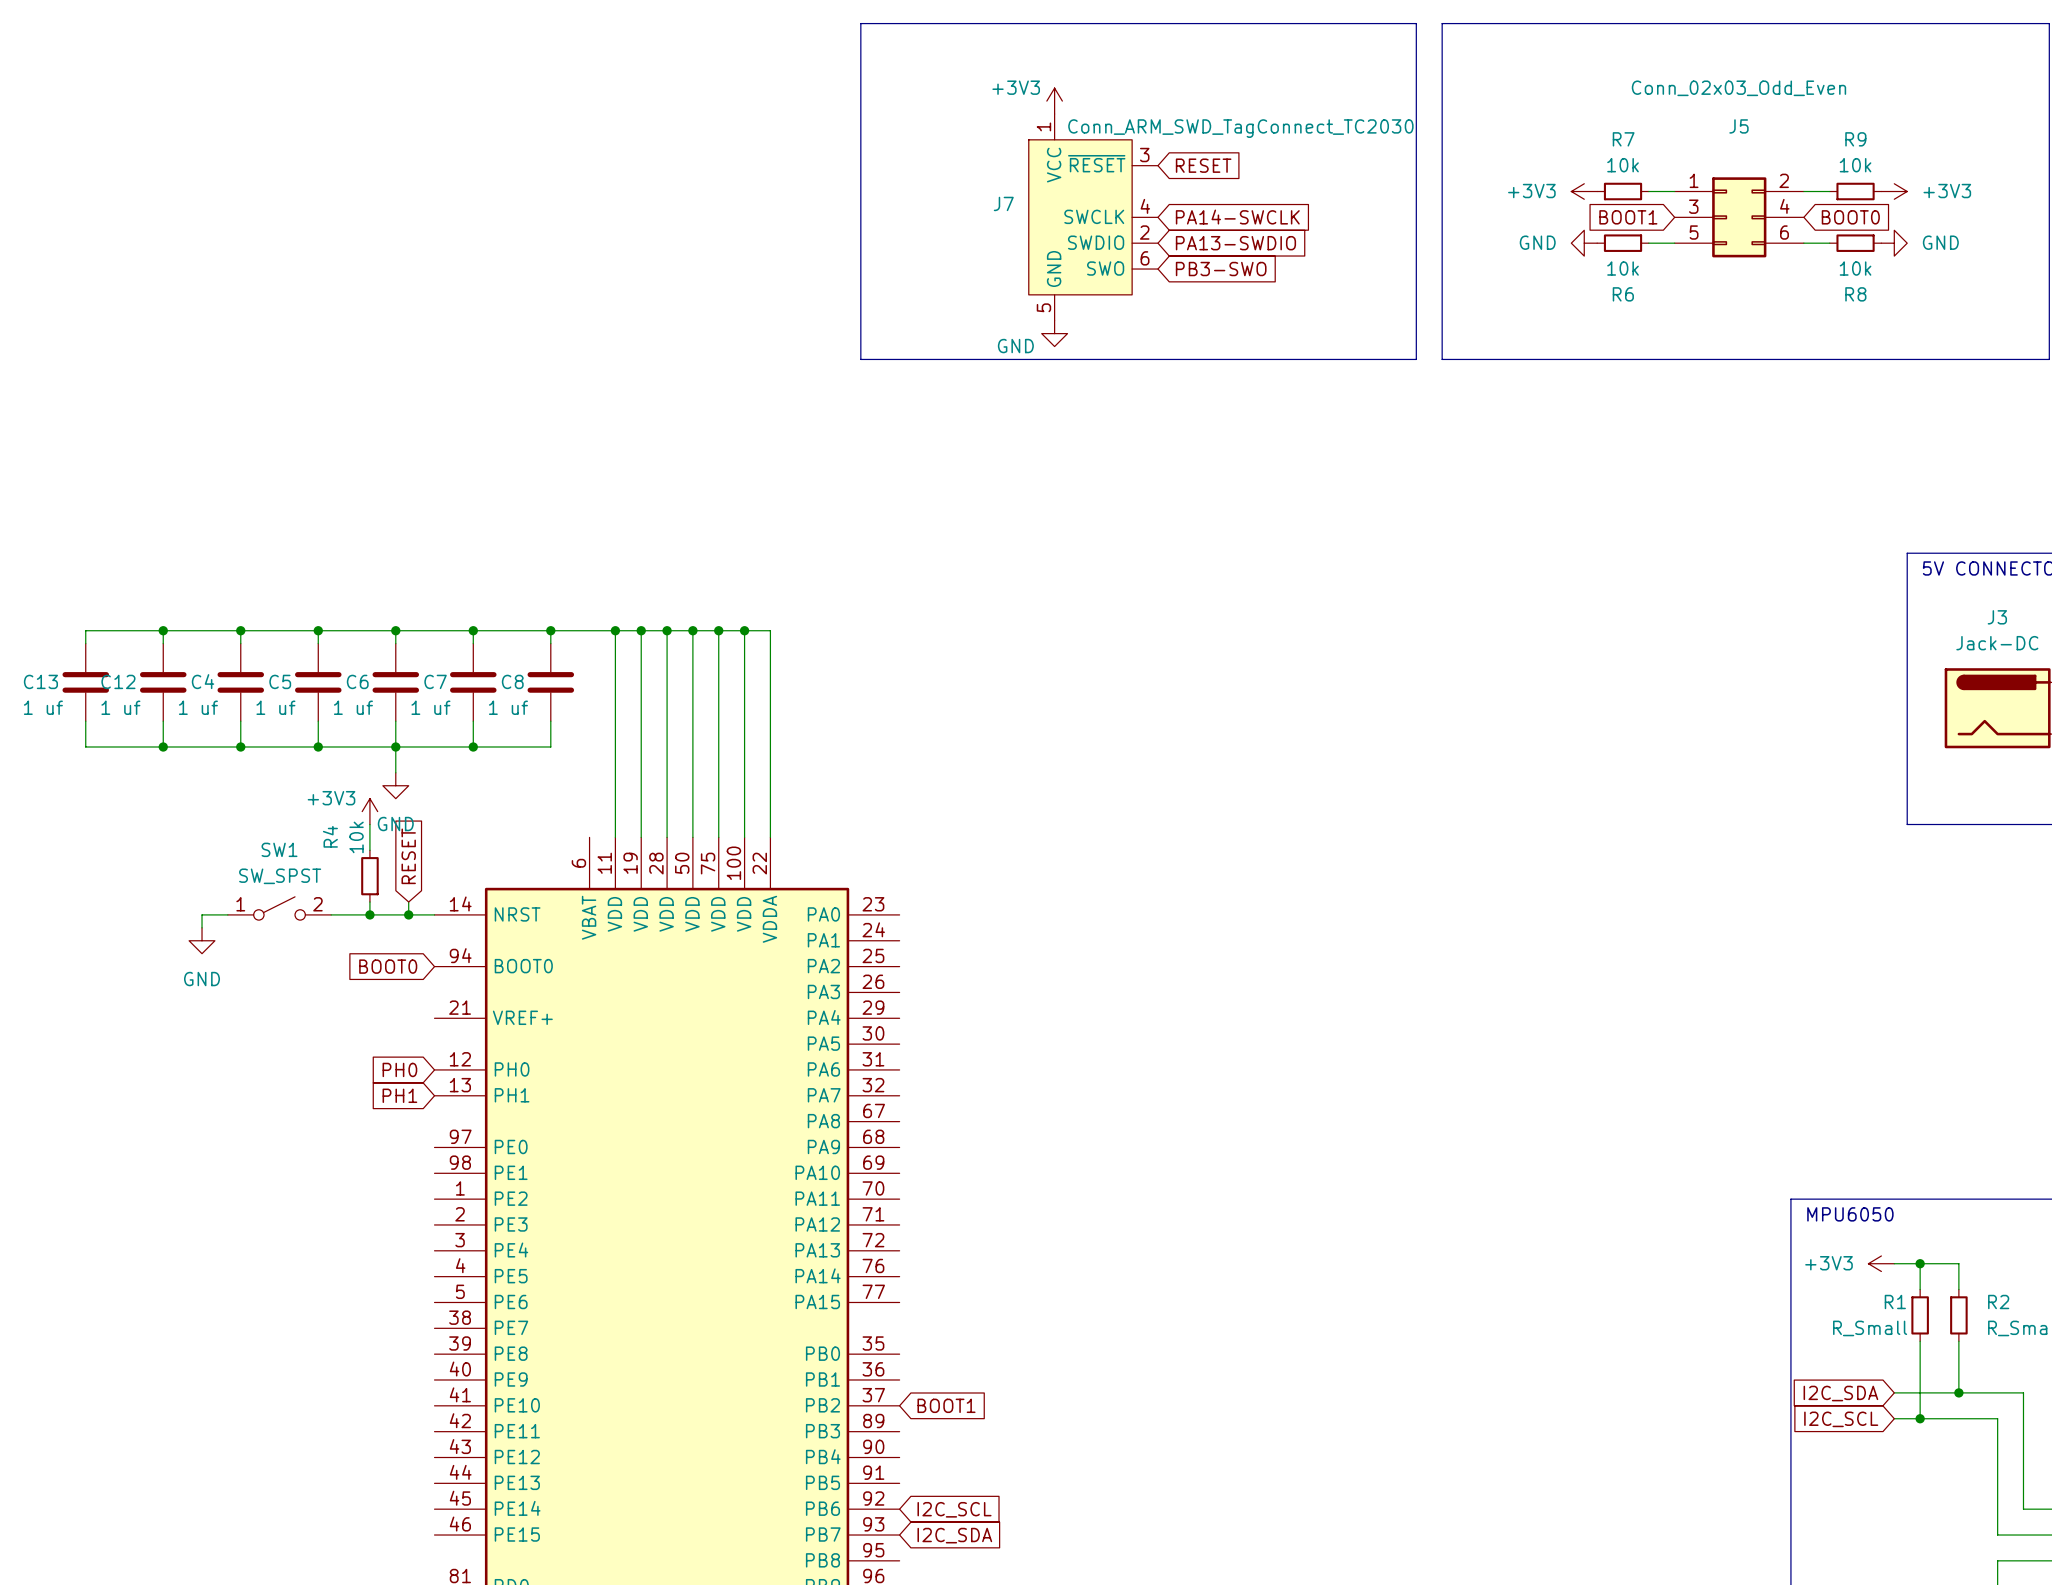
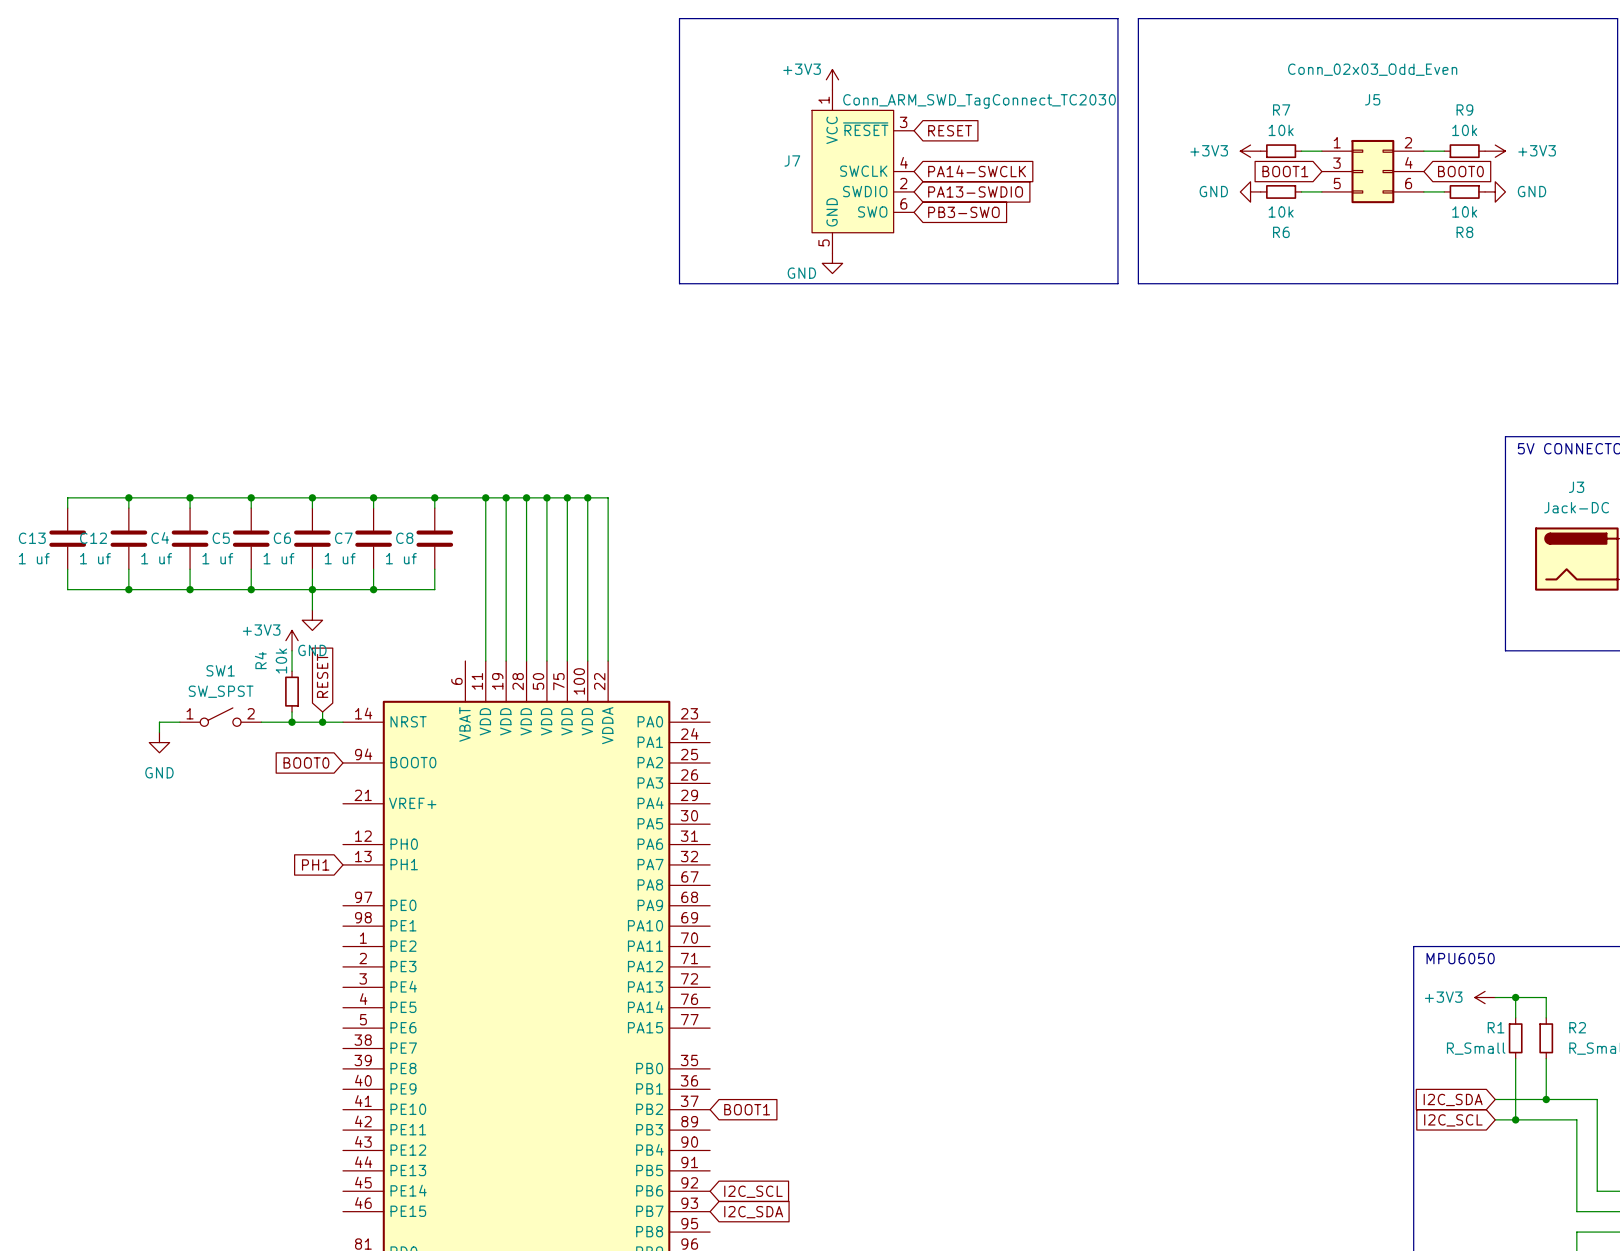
global label: PH0 (399, 1069) -> none

